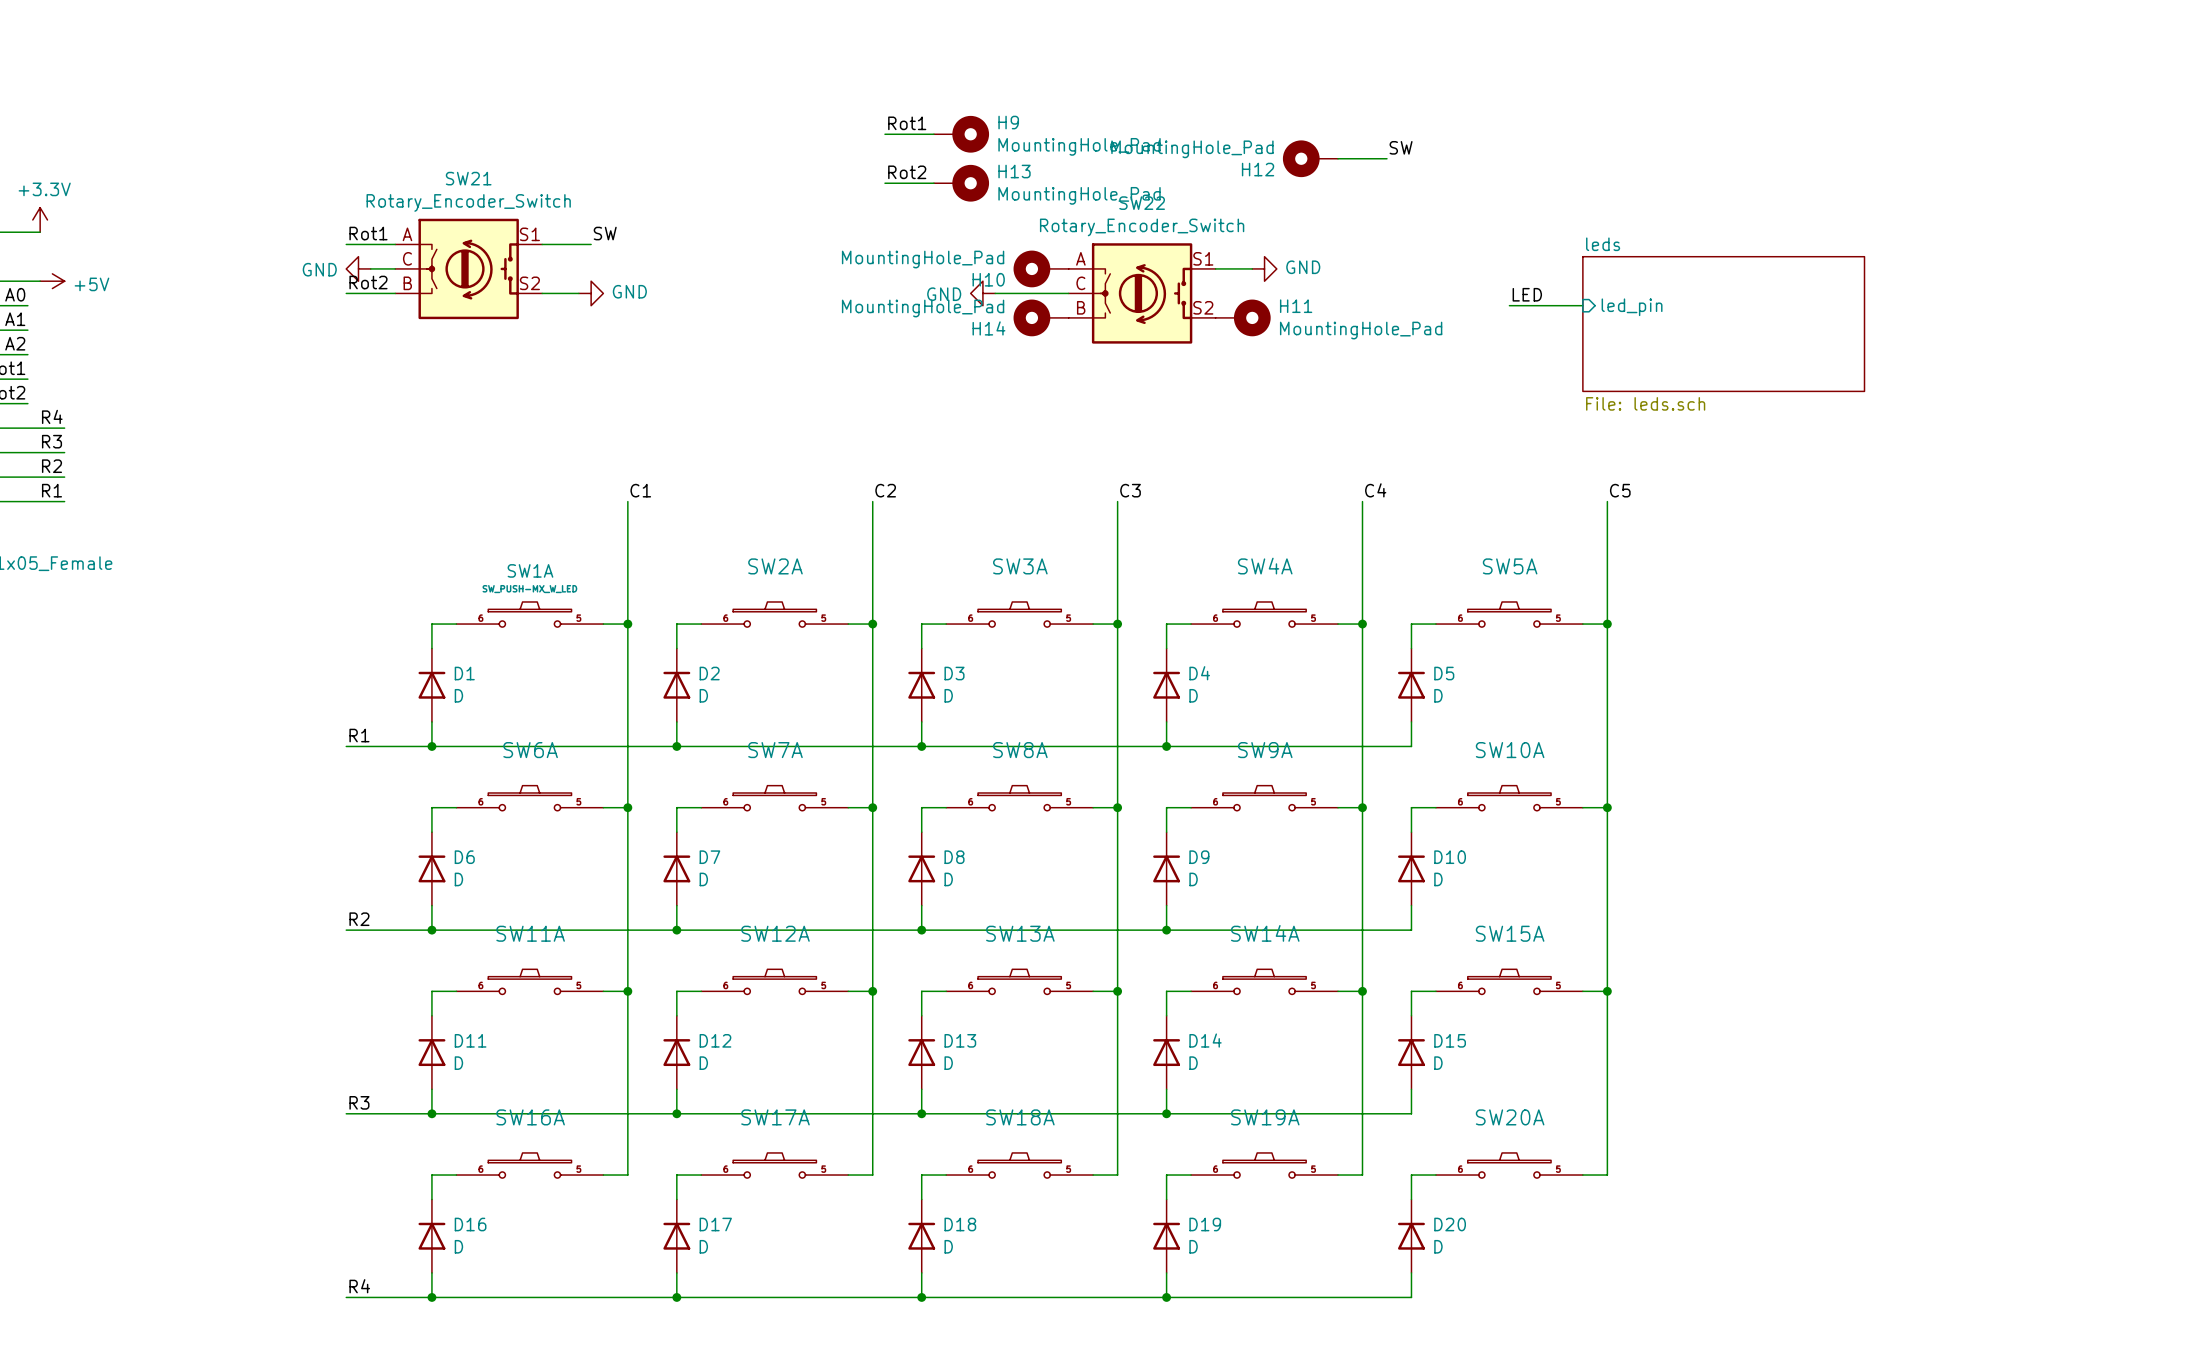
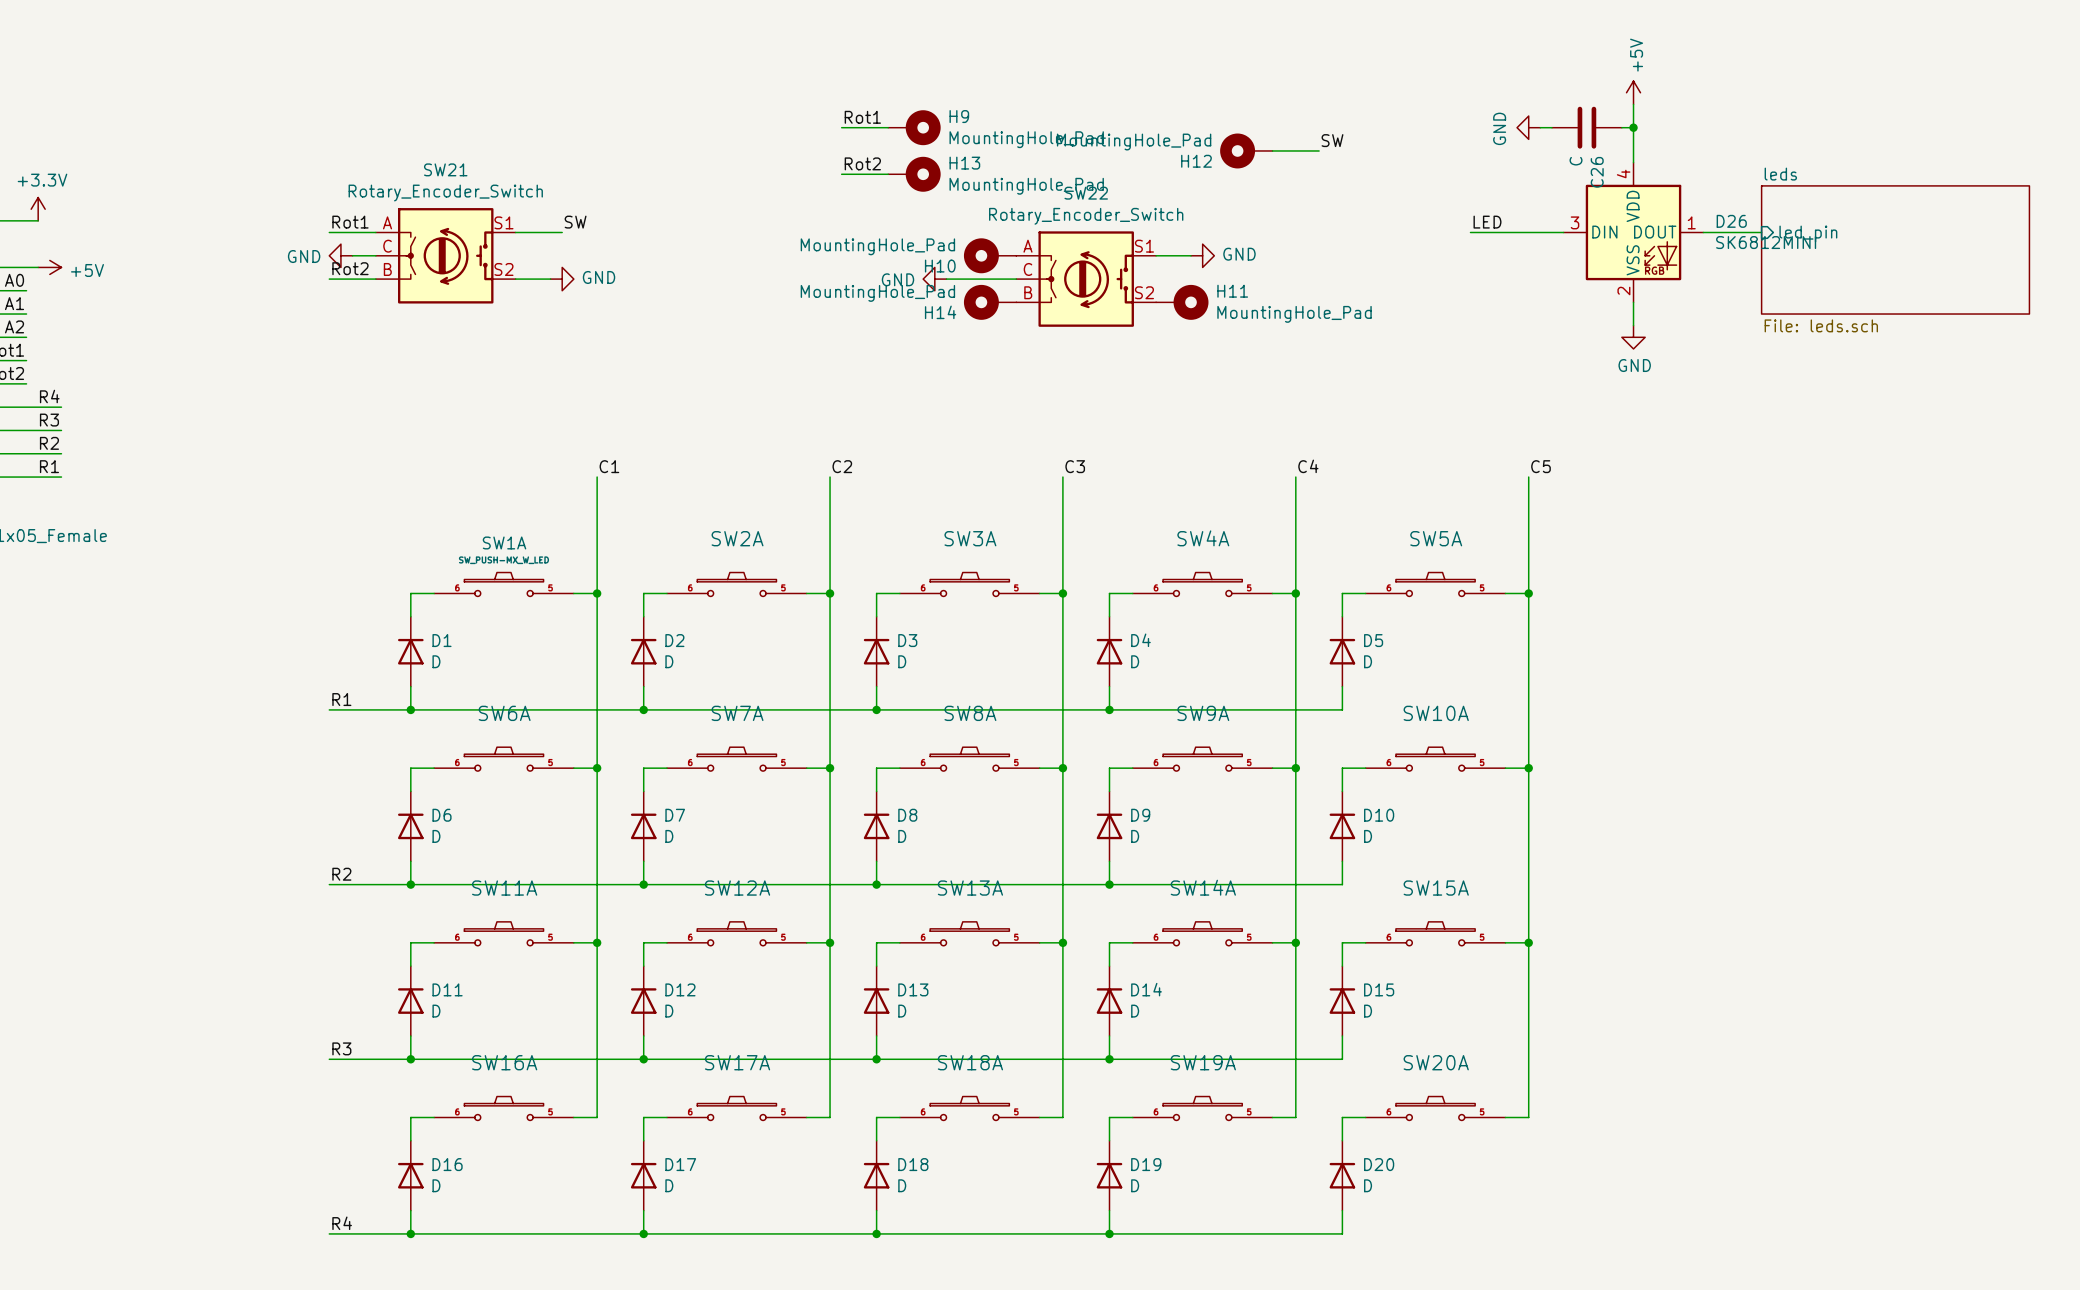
power symbol: none -> +5V (1633, 92)
wire: none -> (1633, 104) (1633, 162)
power symbol: none -> GND (1528, 127)
wire: none -> (1540, 127) (1552, 127)
C26: none -> C (1586, 127)
wire: none -> (1621, 127) (1633, 127)
junction: none -> (1633, 127)
wire: none -> (1470, 232) (1563, 232)
D26: none -> SK6812MINI (1633, 232)
wire: none -> (1703, 232) (1761, 232)
sheet pin: none -> led_pin (1808, 234)
sheet leds: none -> File: leds.sch (1895, 249)
label position: LED (1527, 294) -> LED (1487, 222)
wire: (1509, 305) (1582, 305) -> none
sheet pin: led_pin (1632, 307) -> none
wire: none -> (1633, 302) (1633, 325)
sheet leds: File: leds.sch (1723, 324) -> none
power symbol: none -> GND (1633, 337)

